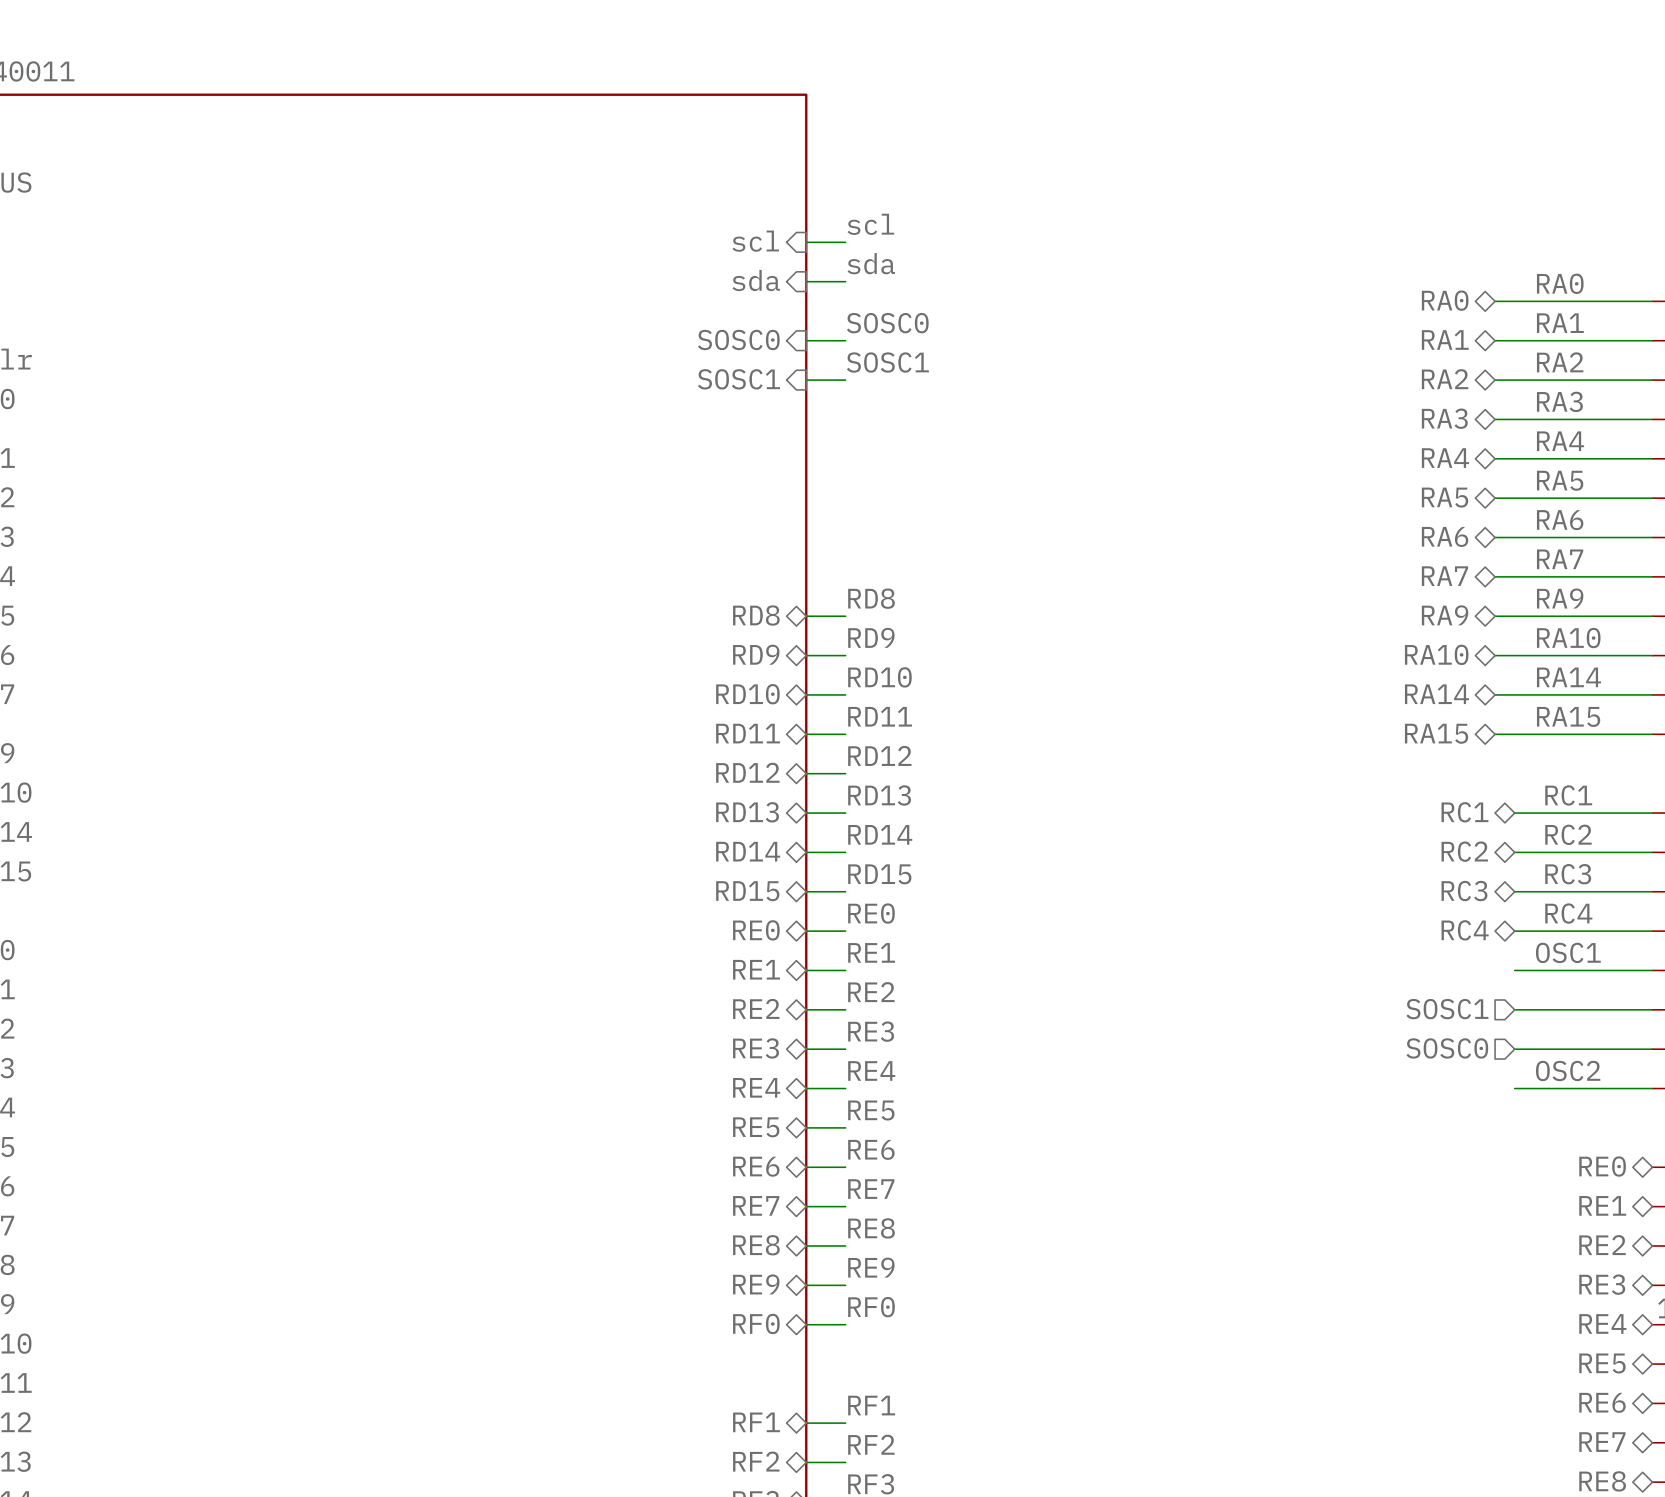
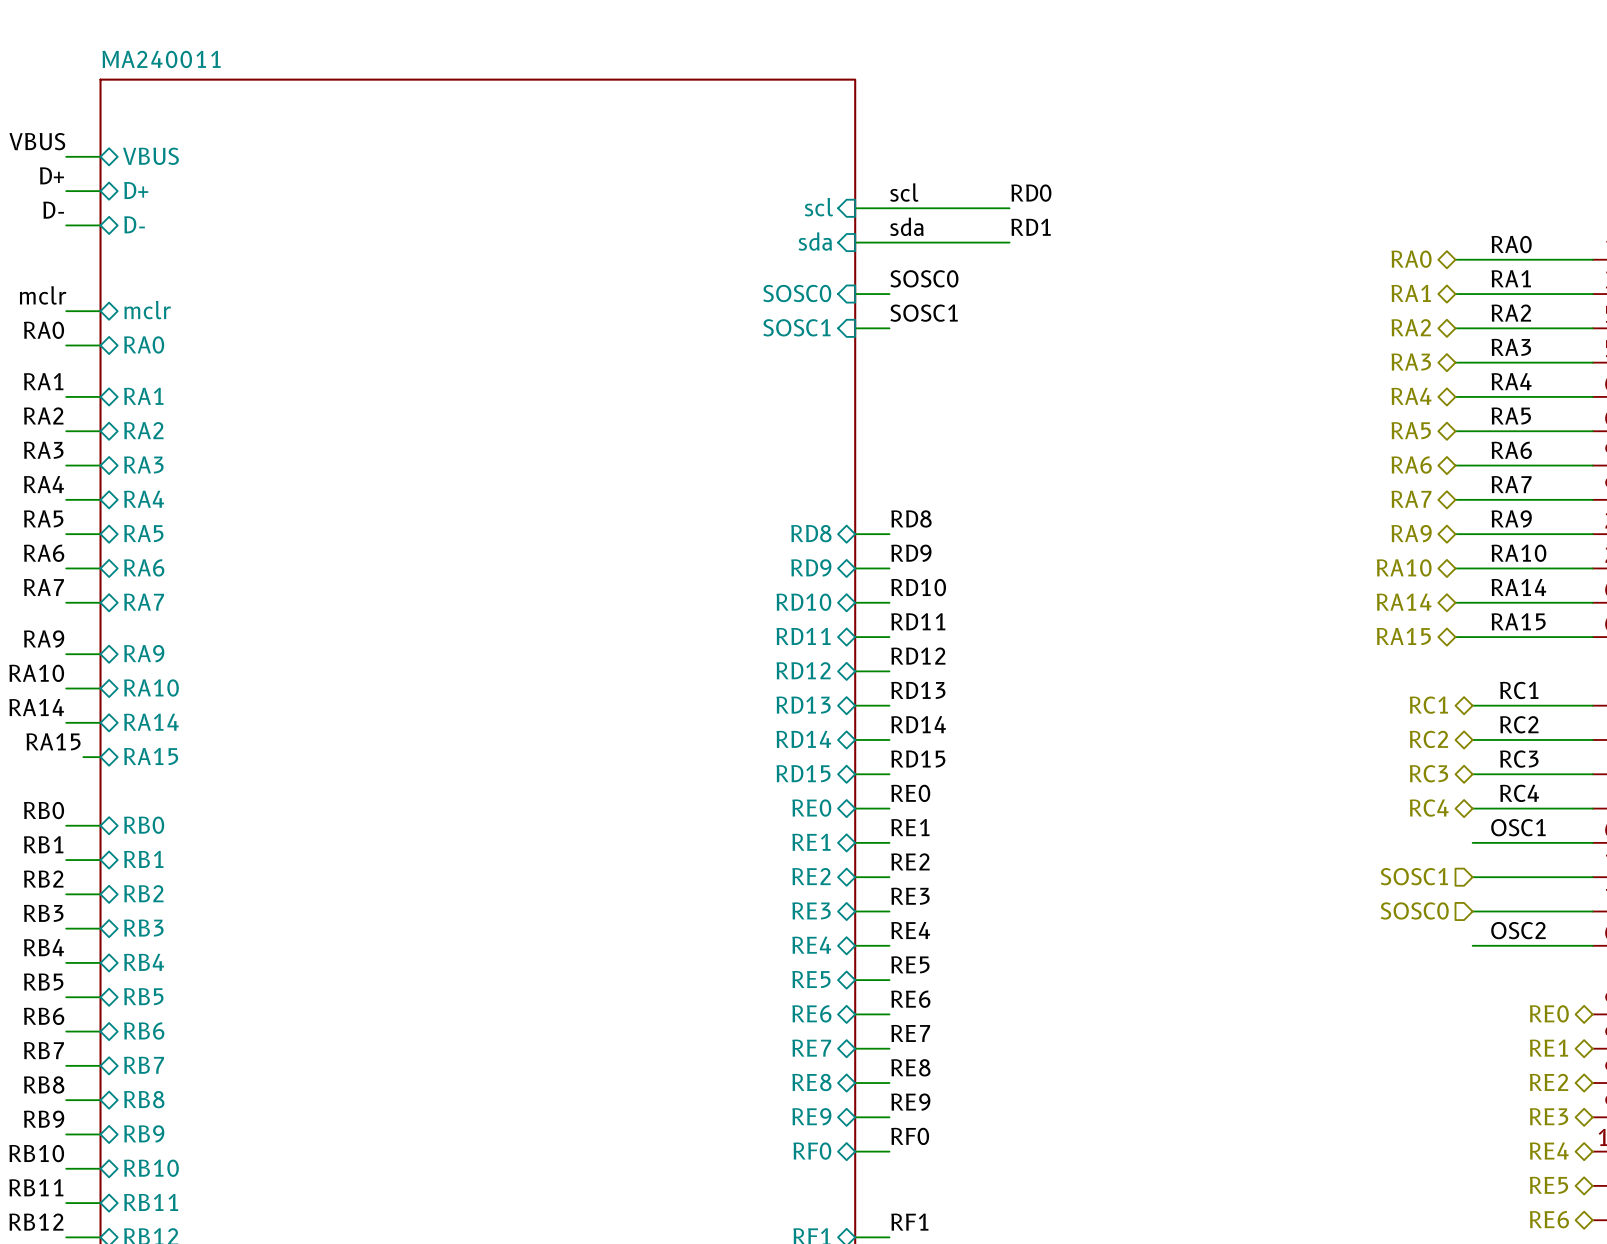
label: none -> RD0 (1031, 193)
wire: none -> (889, 208) (1009, 208)
label: none -> RD1 (1031, 227)
wire: none -> (889, 242) (1009, 242)

